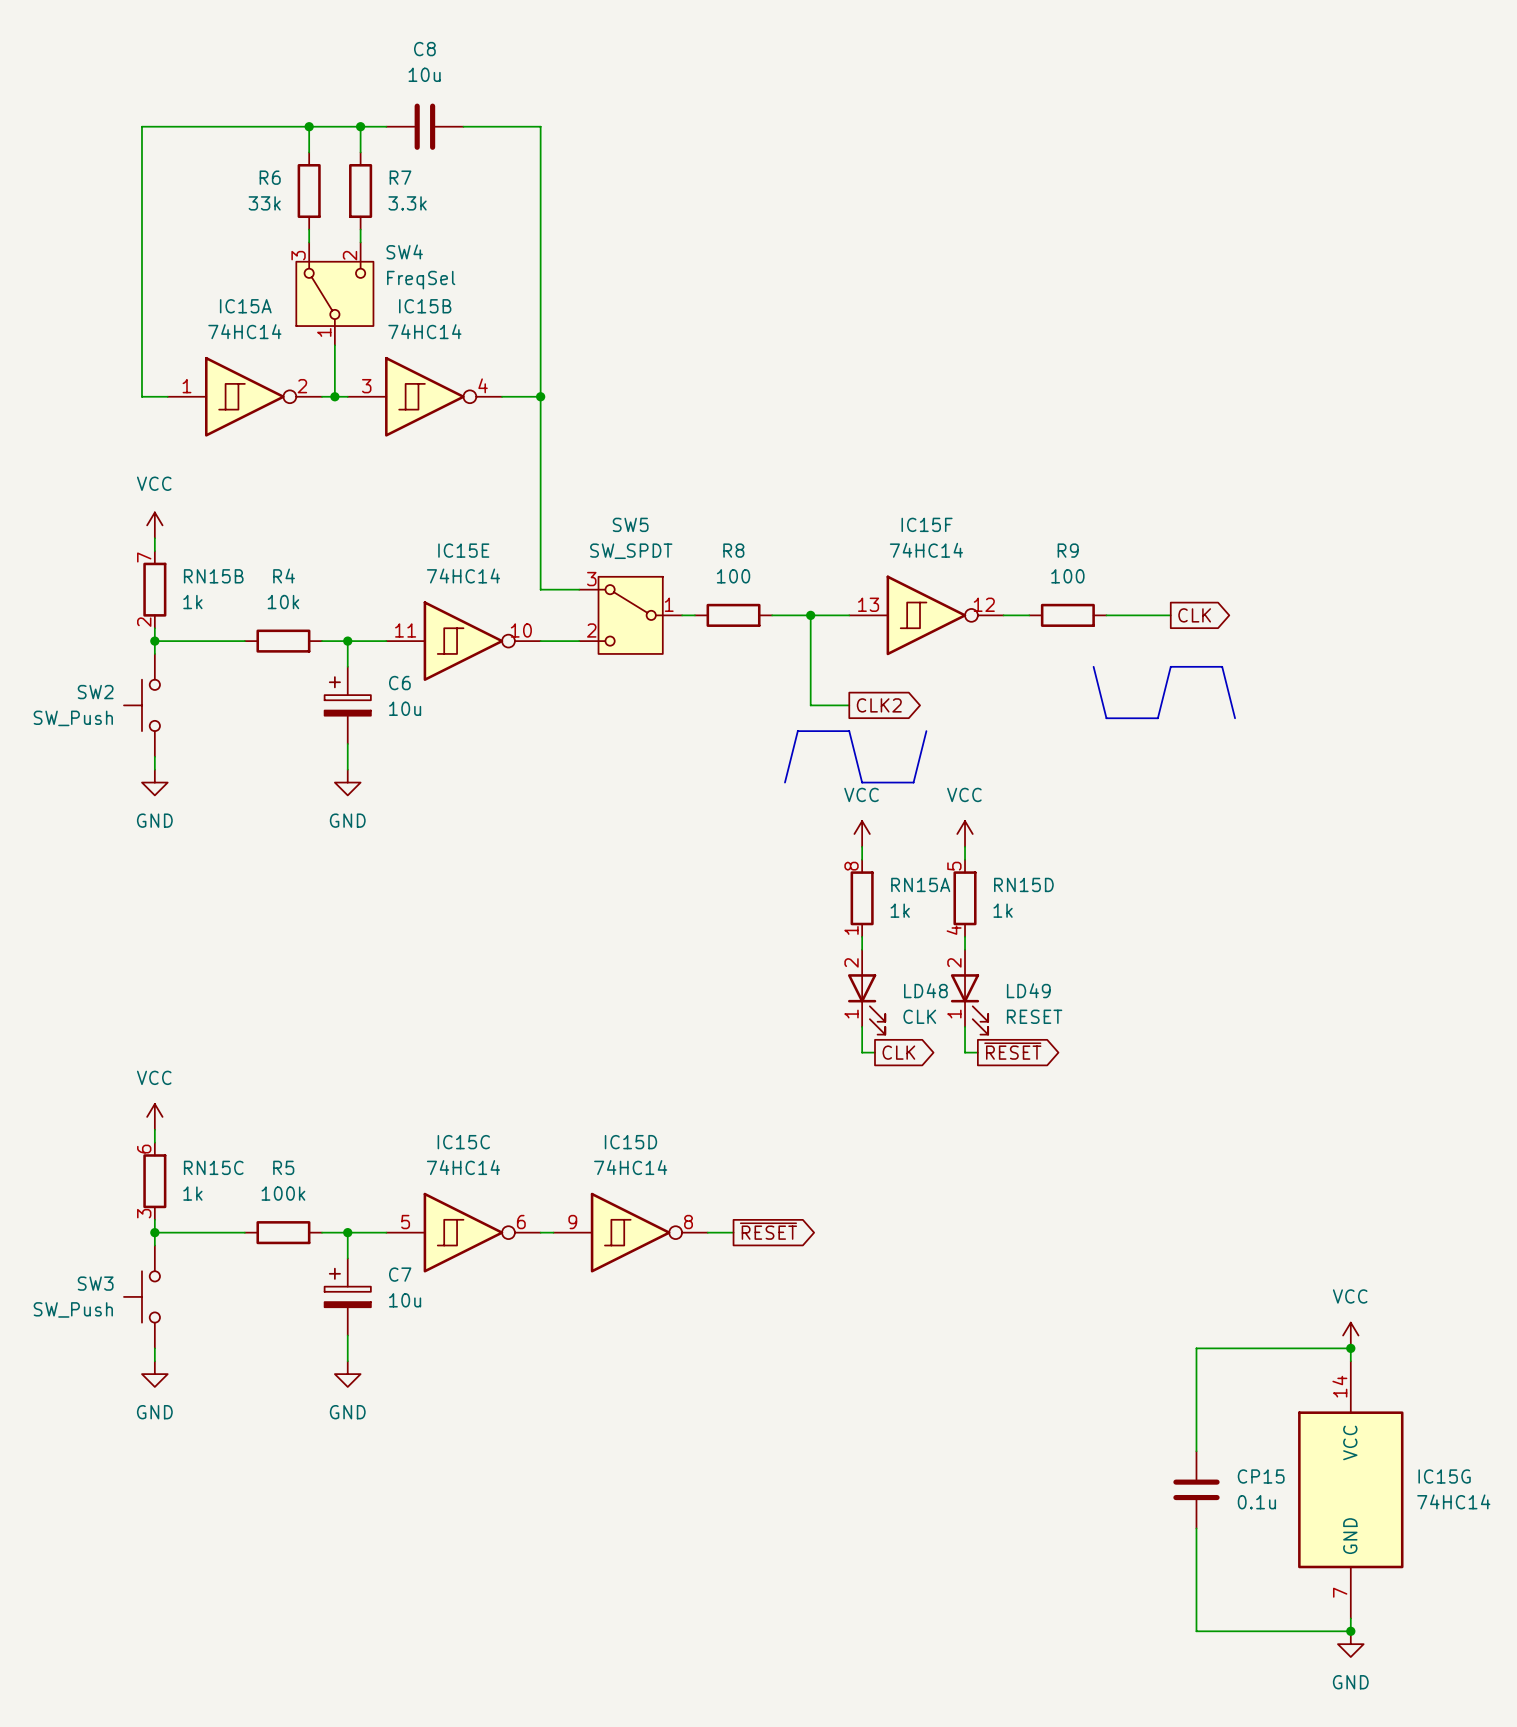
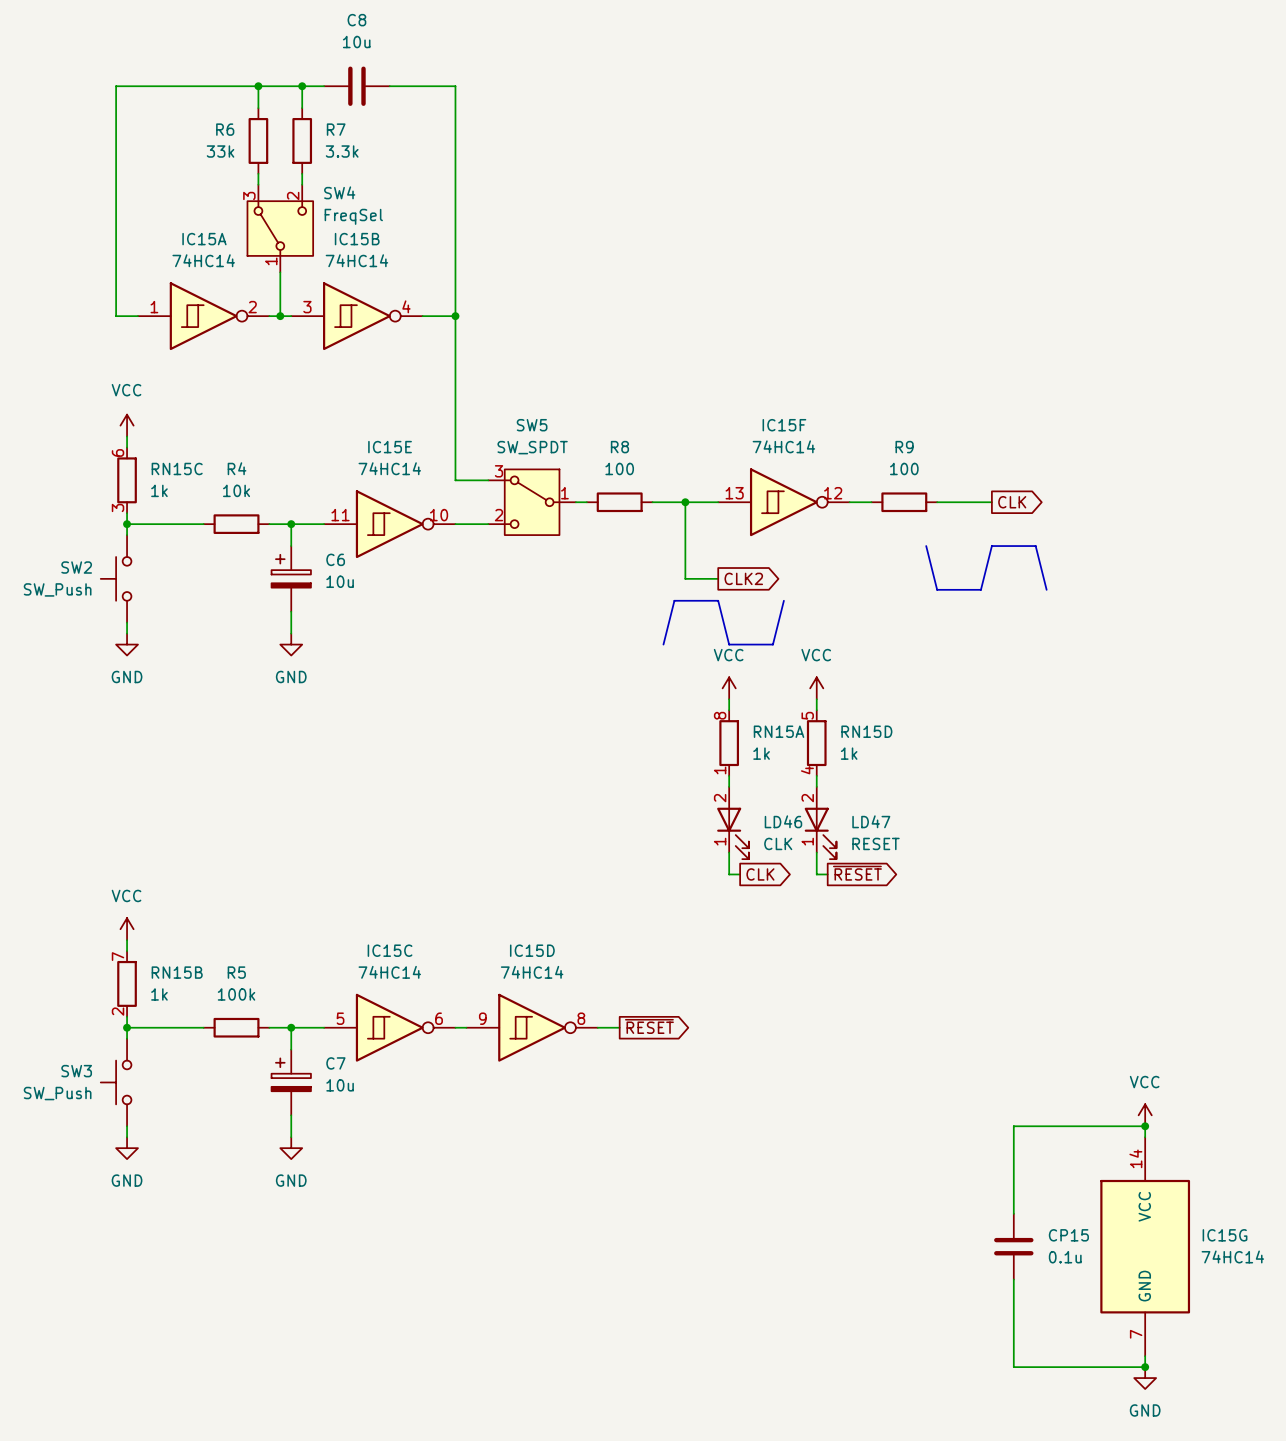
RN15B position: (154, 589) -> (127, 983)
LD48 name: LD48 (925, 990) -> LD46 (783, 821)
LD49 name: LD49 (1028, 990) -> LD47 (871, 821)
RN15C position: (154, 1181) -> (127, 480)

